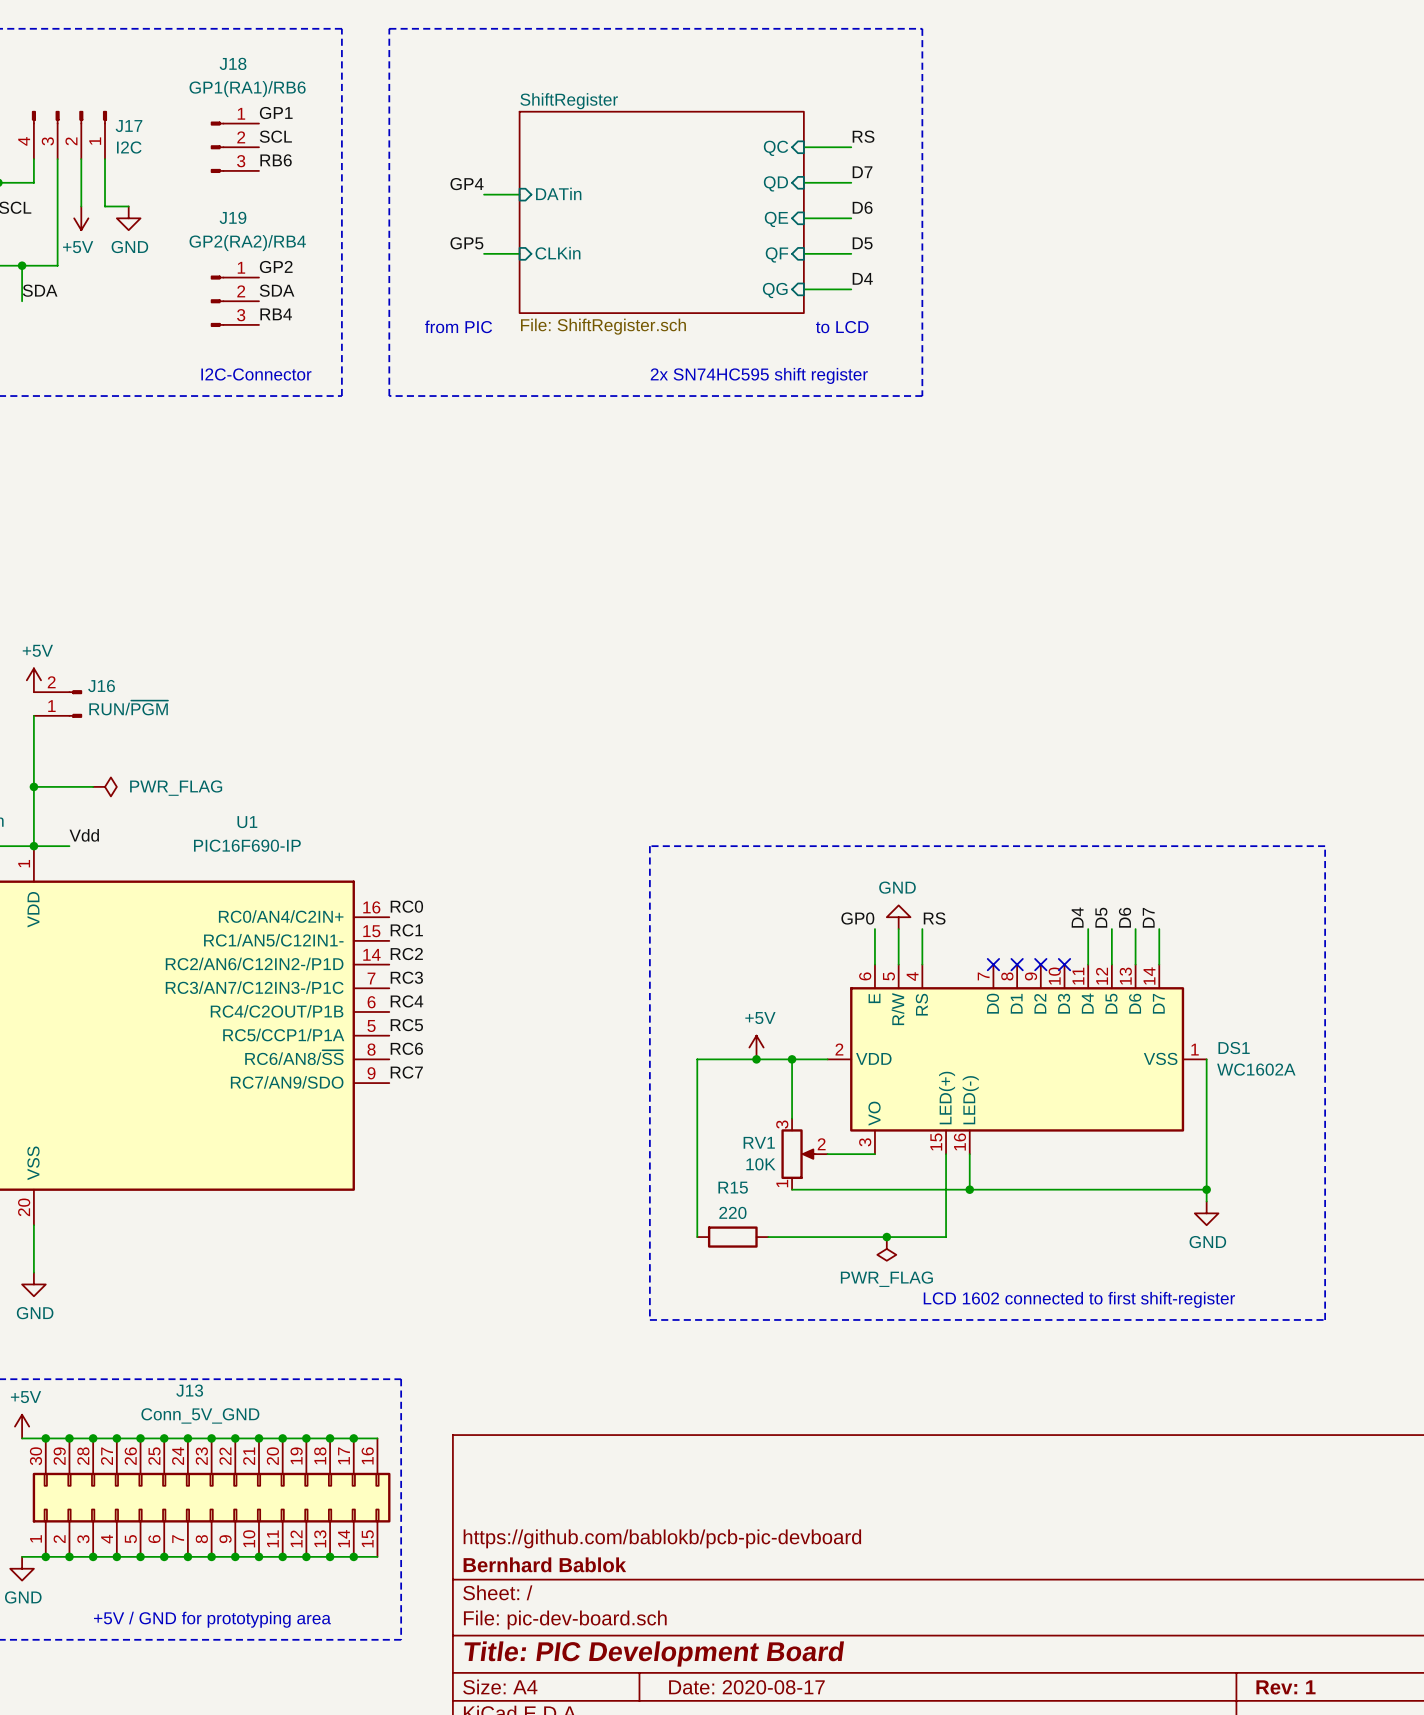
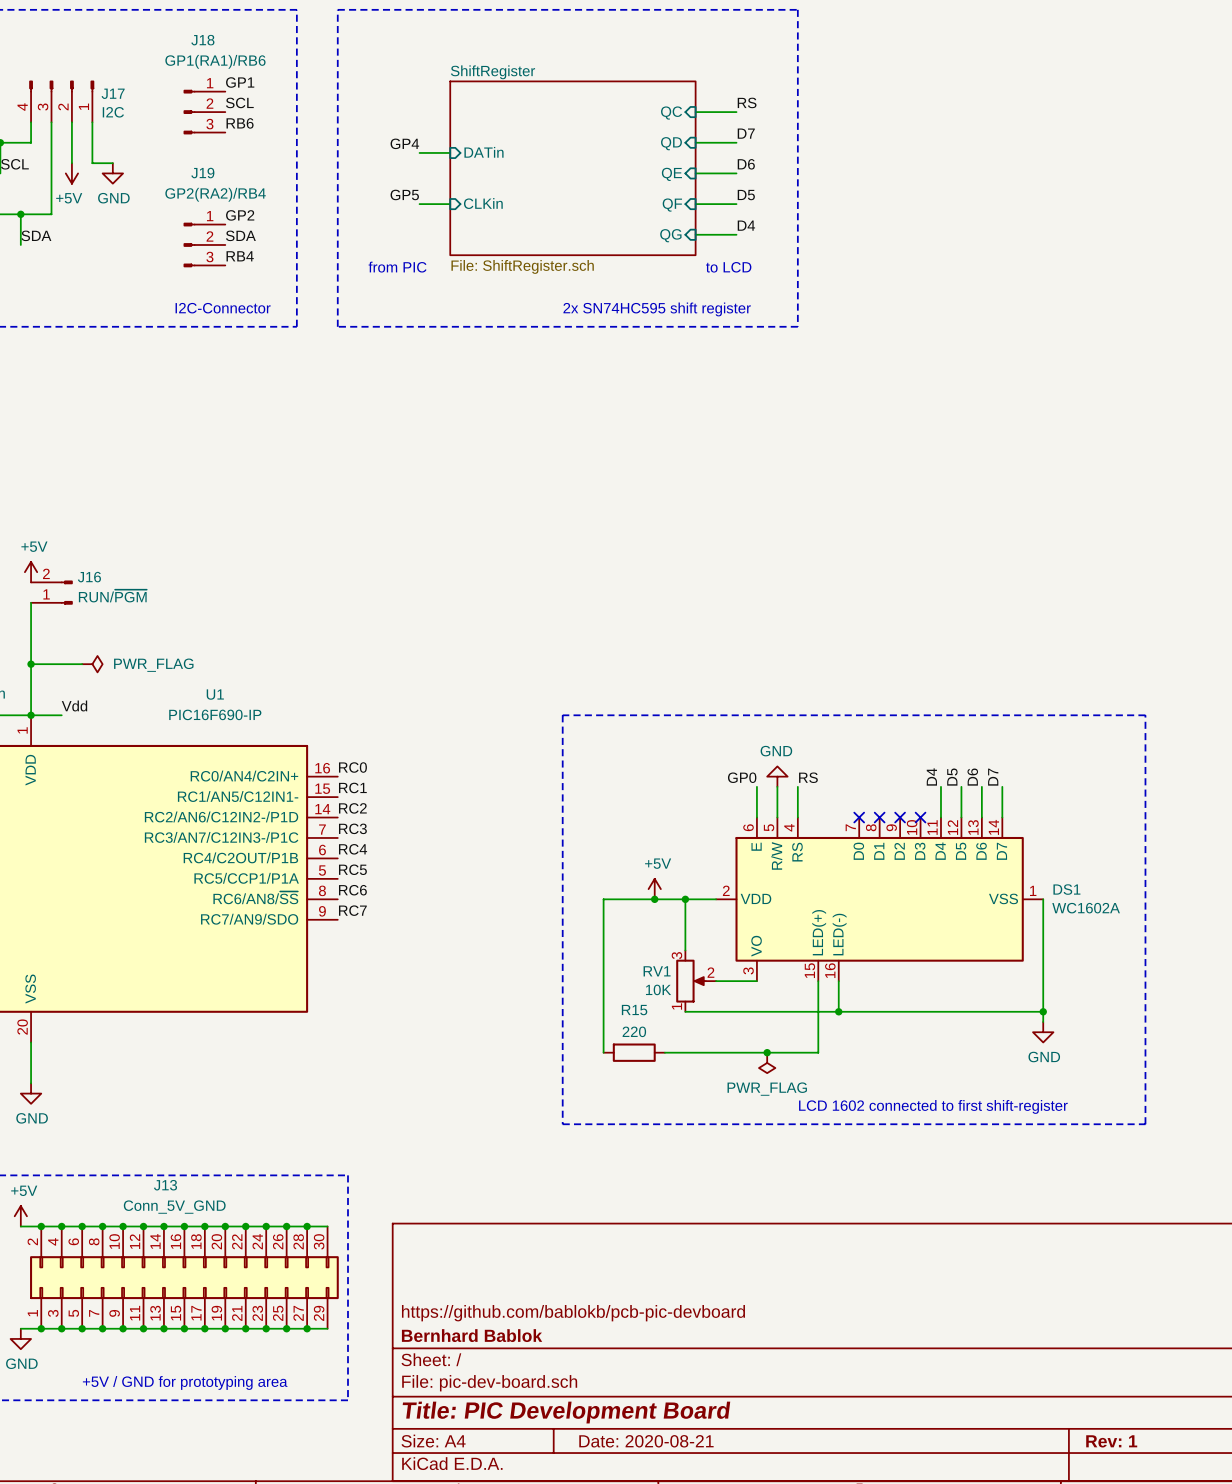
J13 symbol: [32, 1438, 391, 1557] -> [30, 1226, 339, 1329]
title block: Date: 2020-08-17 (746, 1687) -> Date: 2020-08-21 (646, 1441)

